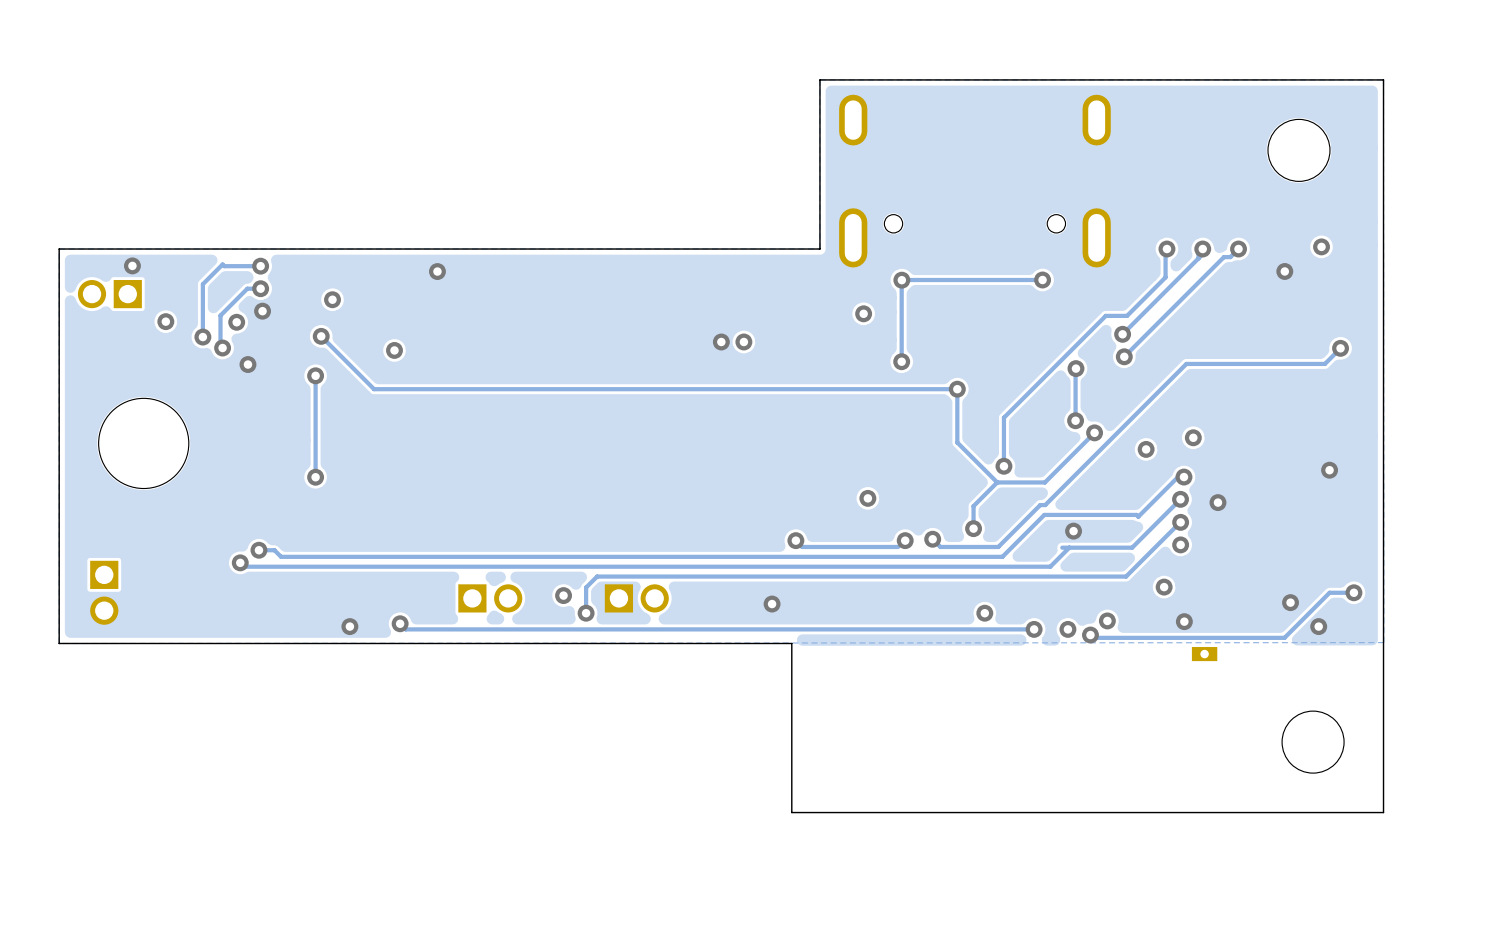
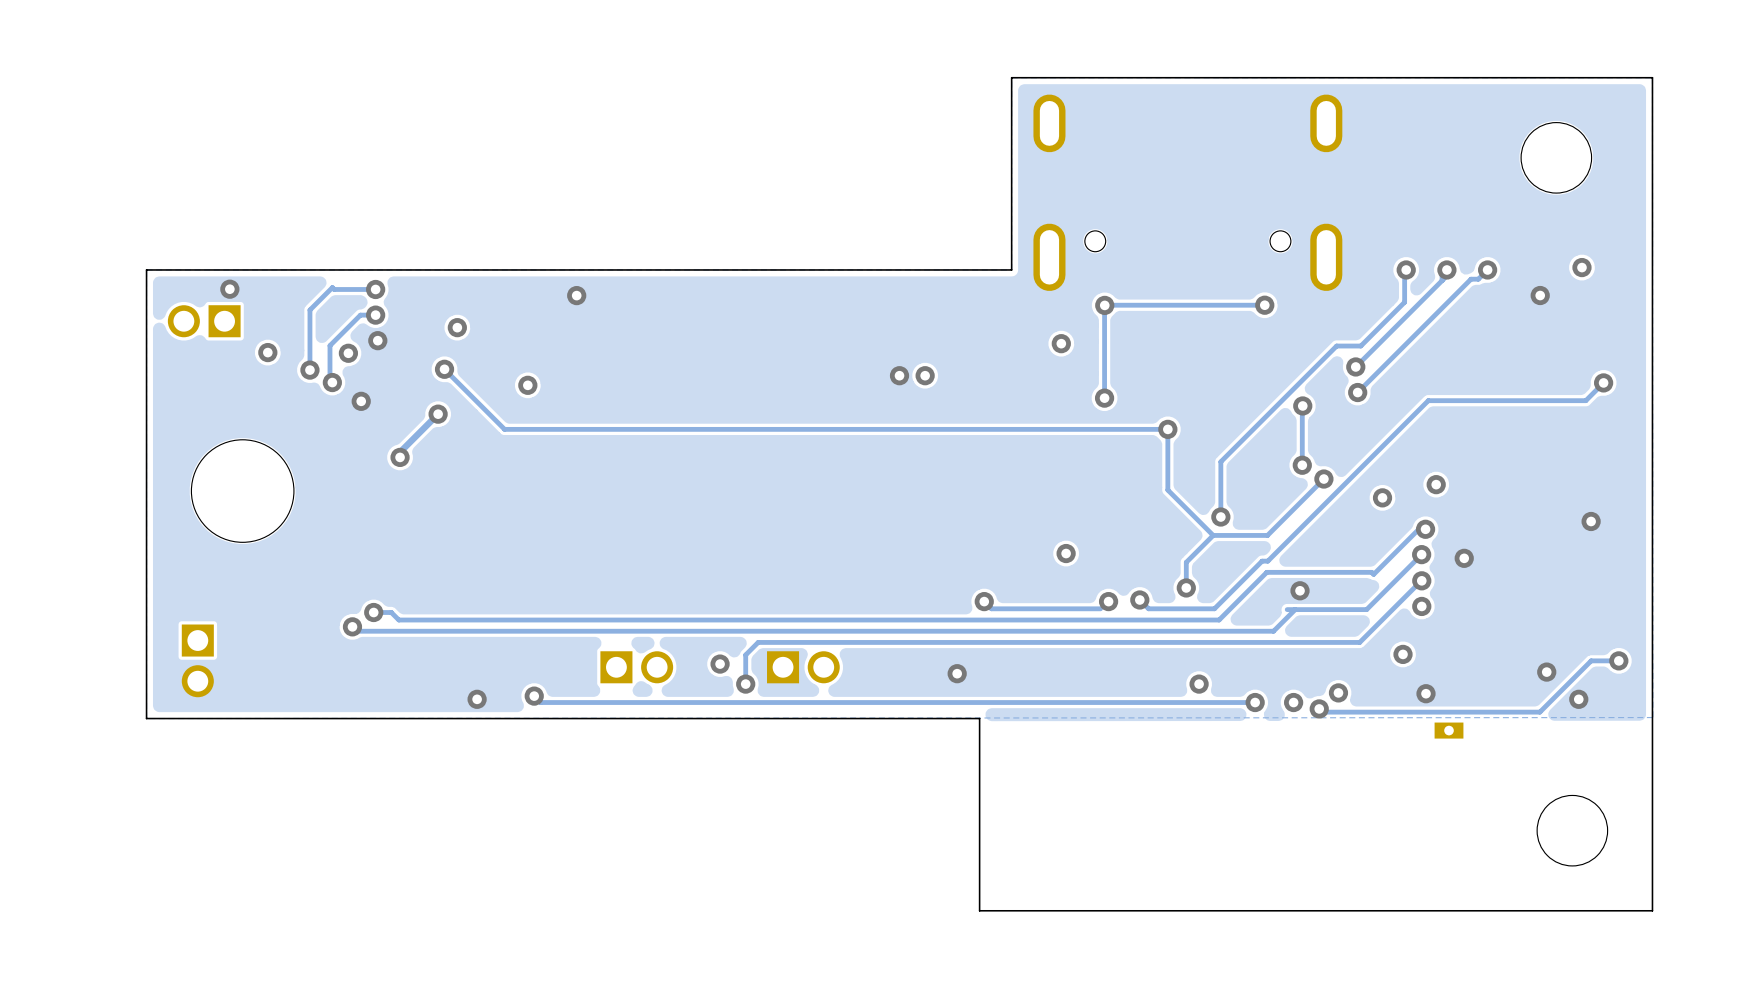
track: (315, 375) (315, 477) -> (438, 414) (400, 452) (400, 457)
via position: (315, 477) -> (400, 457)

